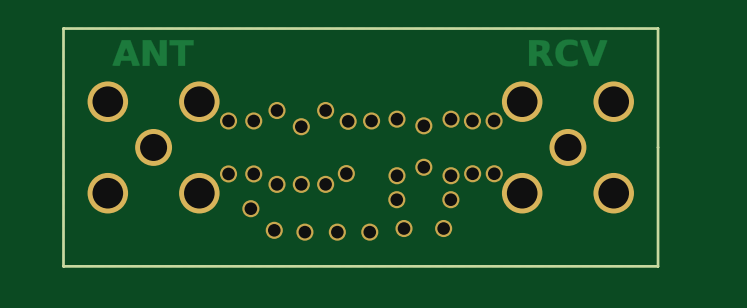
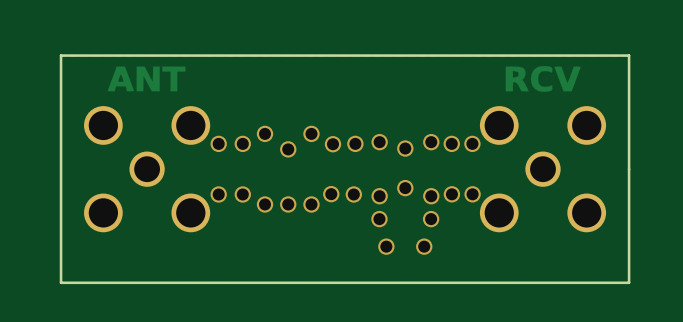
via: none -> (353, 194)
via: (250, 208) -> none
via: (274, 230) -> none
via: (304, 232) -> none
via: (337, 232) -> none
via: (369, 232) -> none

